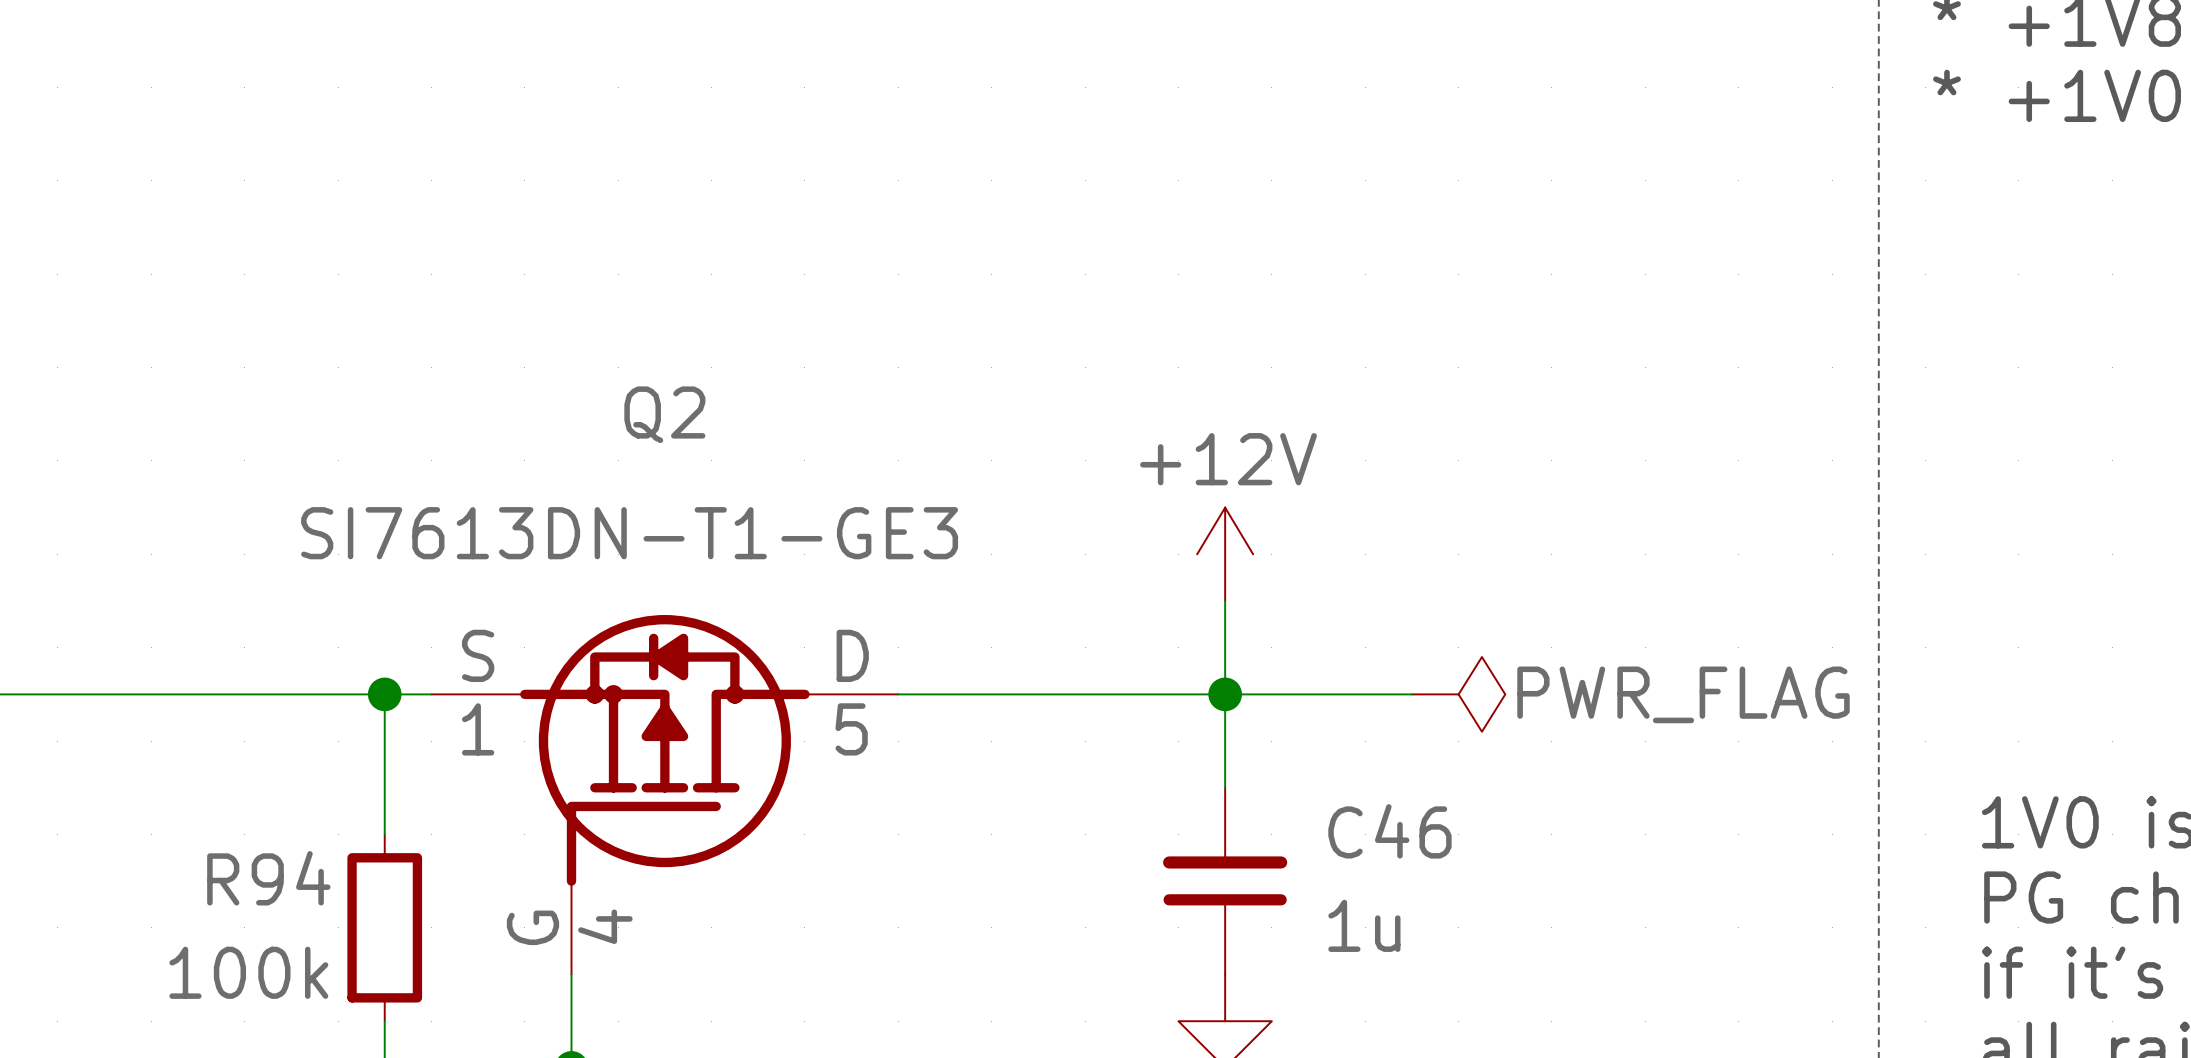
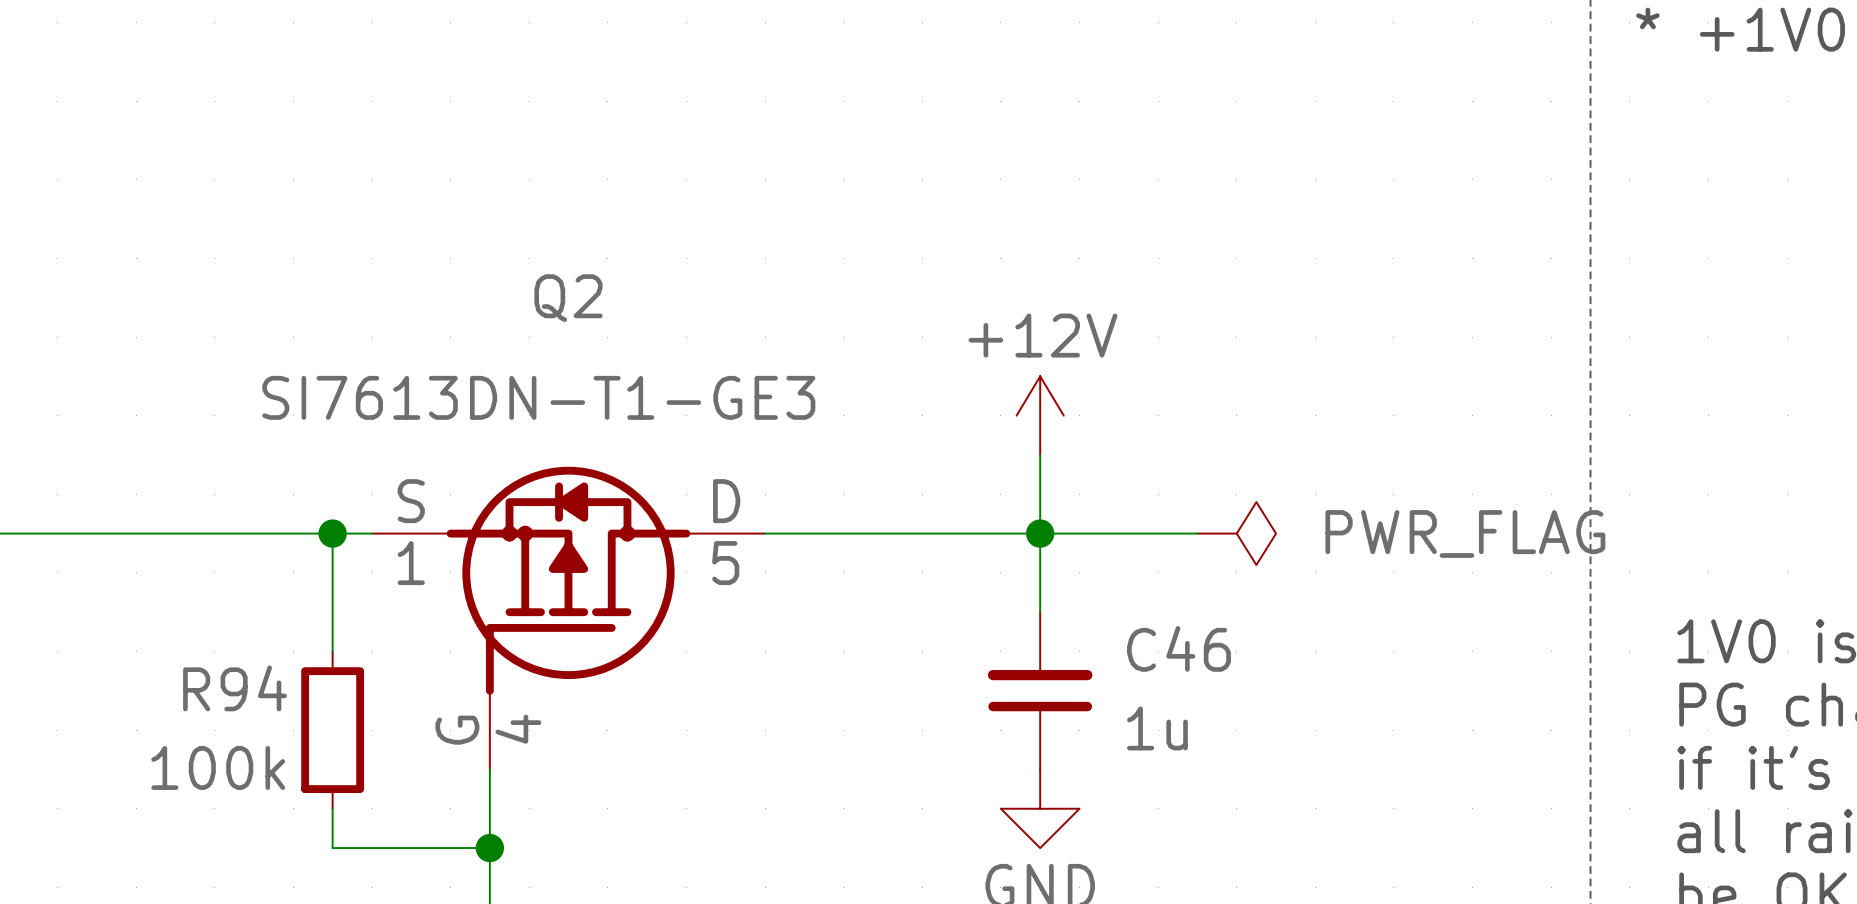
power symbol text position: PWR_FLAG (1683, 694) -> PWR_FLAG (1465, 533)

